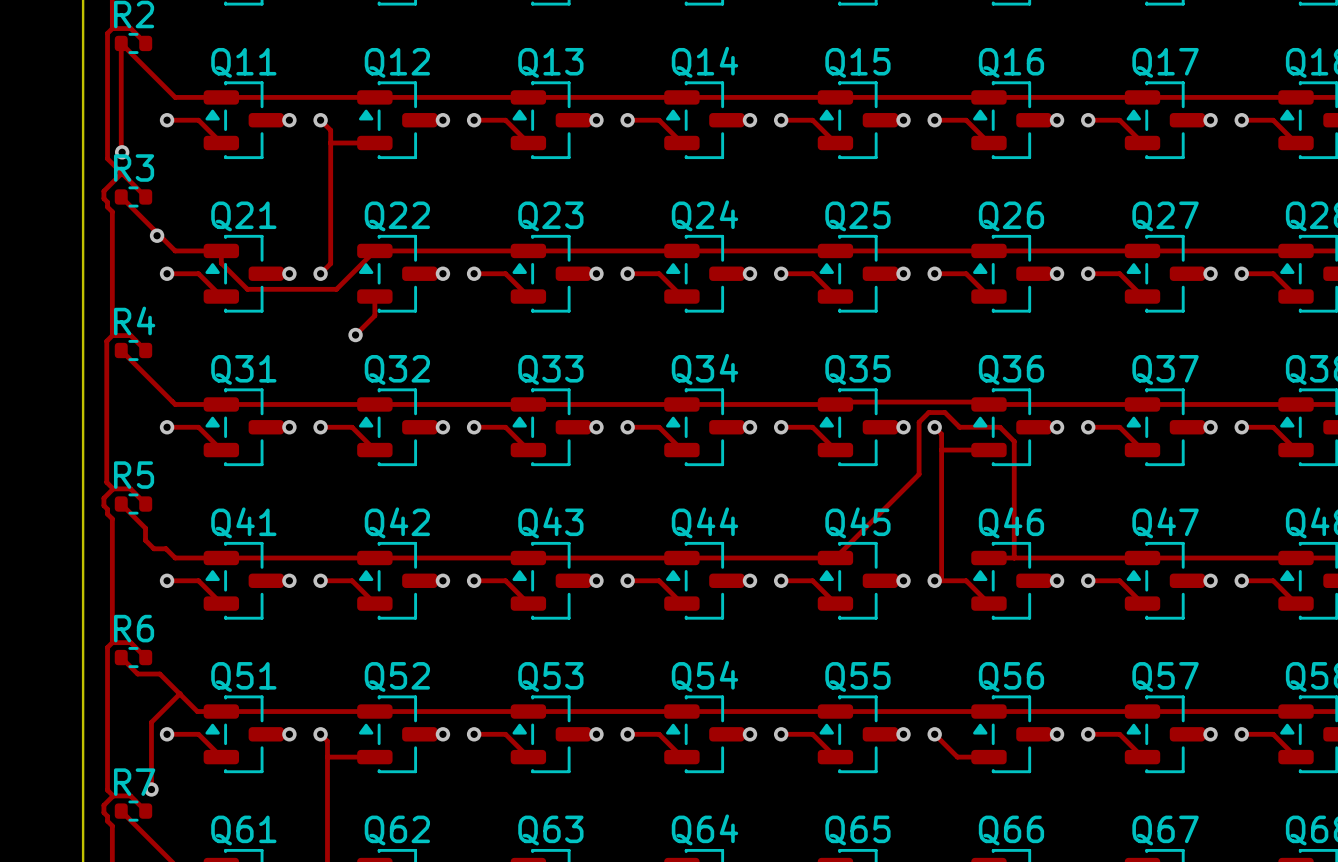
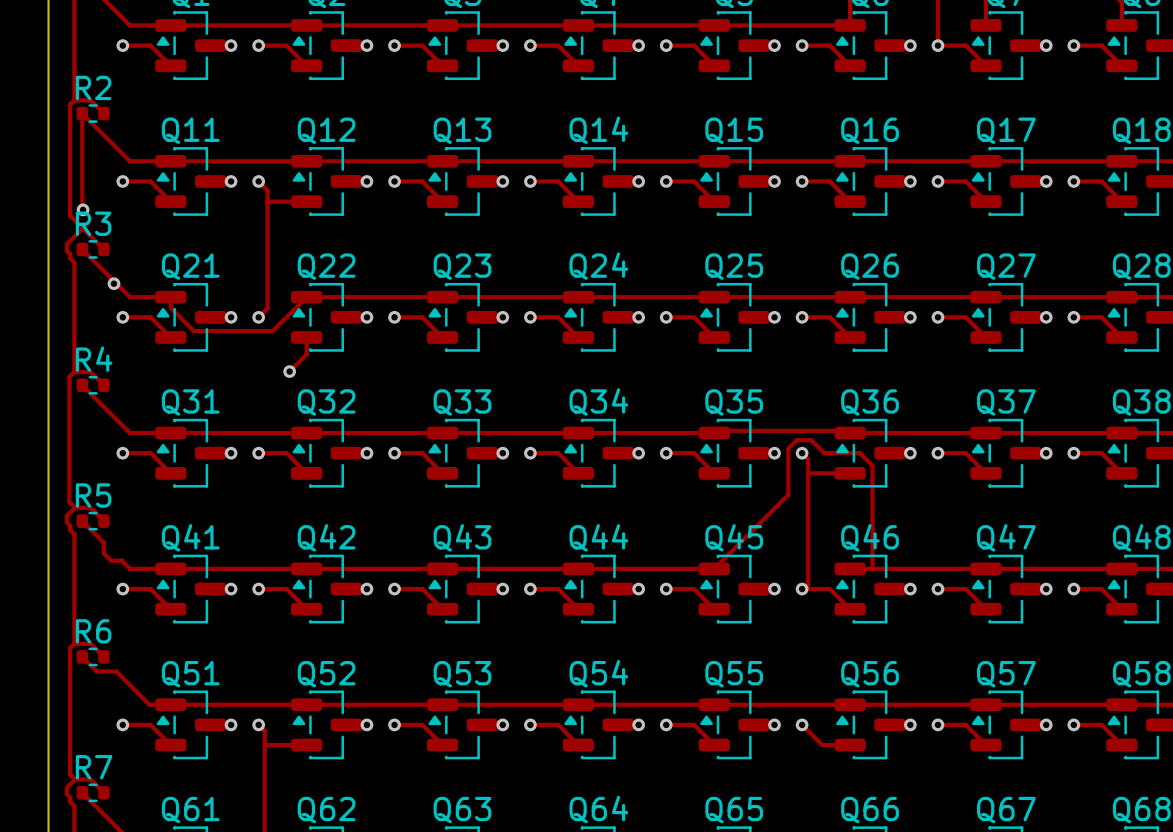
track: (180, 693) (151, 722) (151, 789) -> none
via: (151, 789) -> none

